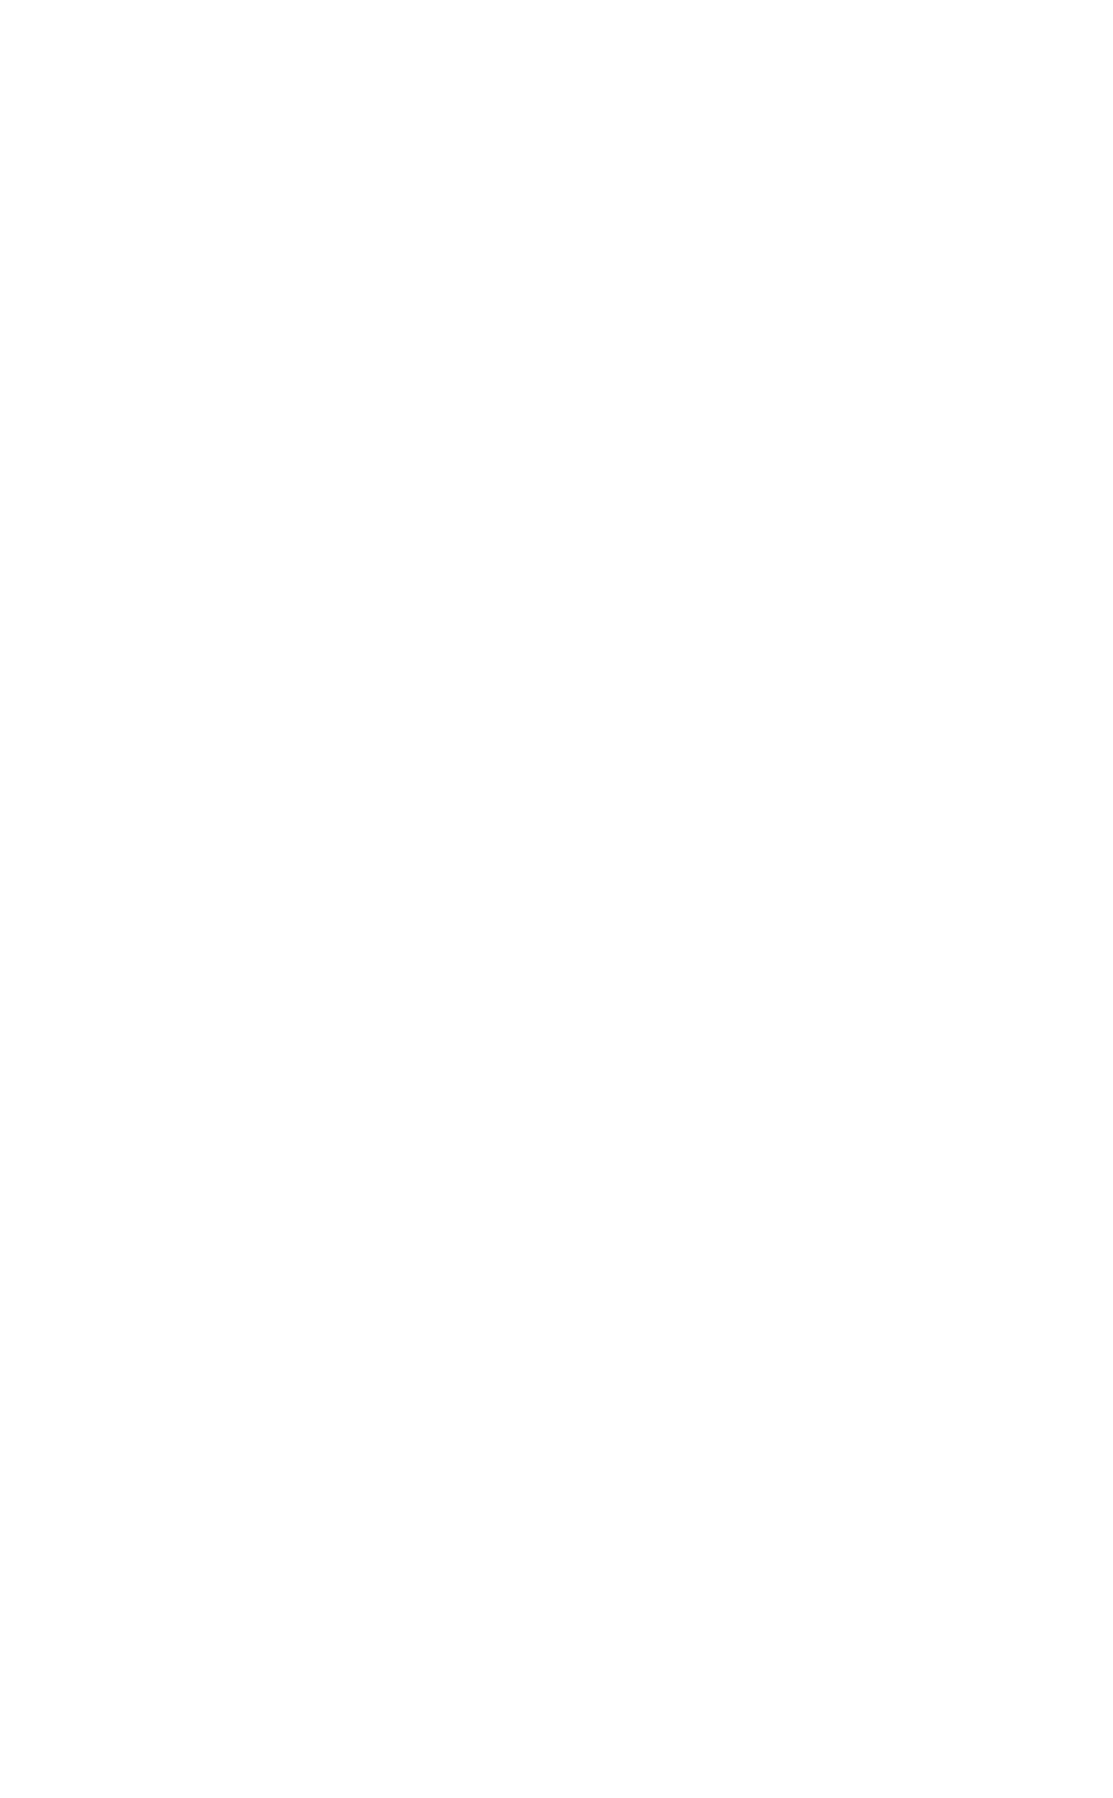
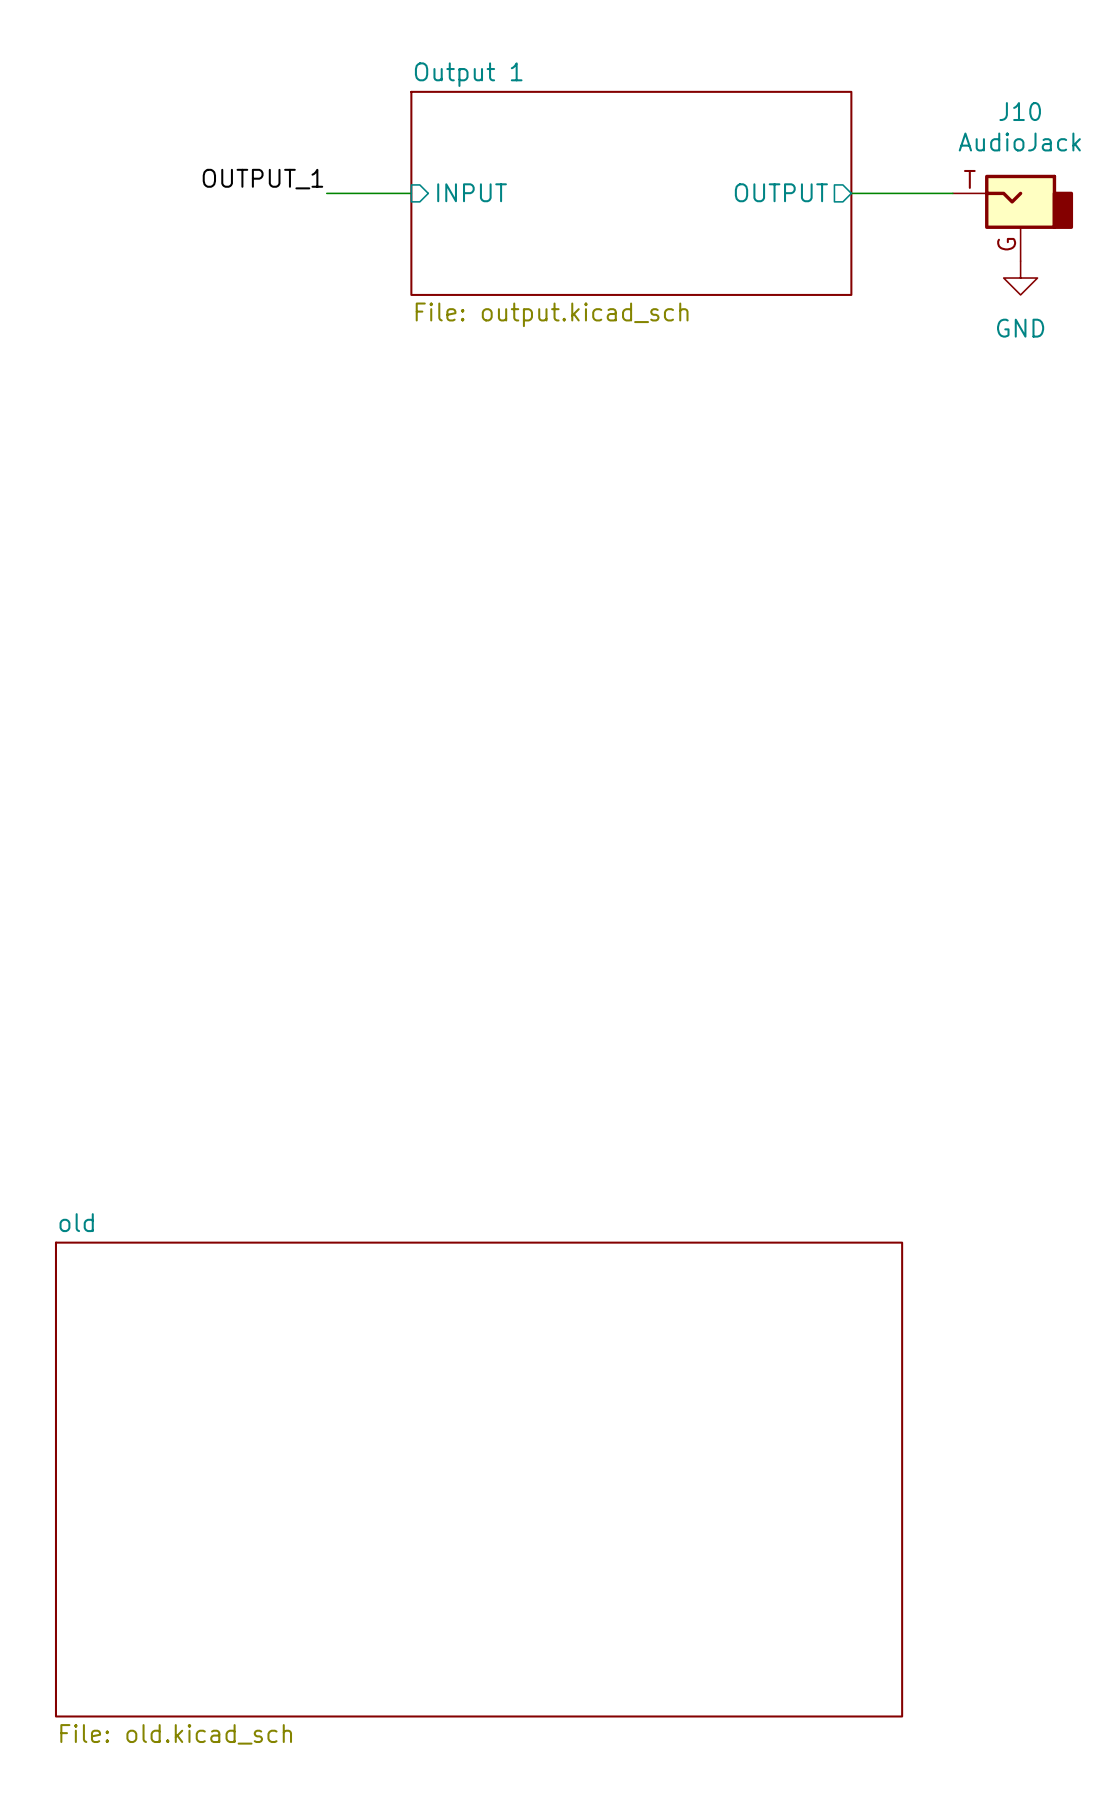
label: none -> OUTPUT_1 (262, 179)
sheet pin: none -> INPUT (472, 192)
sheet pin: none -> OUTPUT (781, 192)
wire: none -> (326, 193) (411, 193)
sheet Output 1: none -> File: output.kicad_sch (631, 193)
wire: none -> (851, 193) (952, 193)
J10: none -> AudioJack (1012, 217)
power symbol: none -> GND (1020, 278)
sheet old: none -> File: old.kicad_sch (479, 1479)

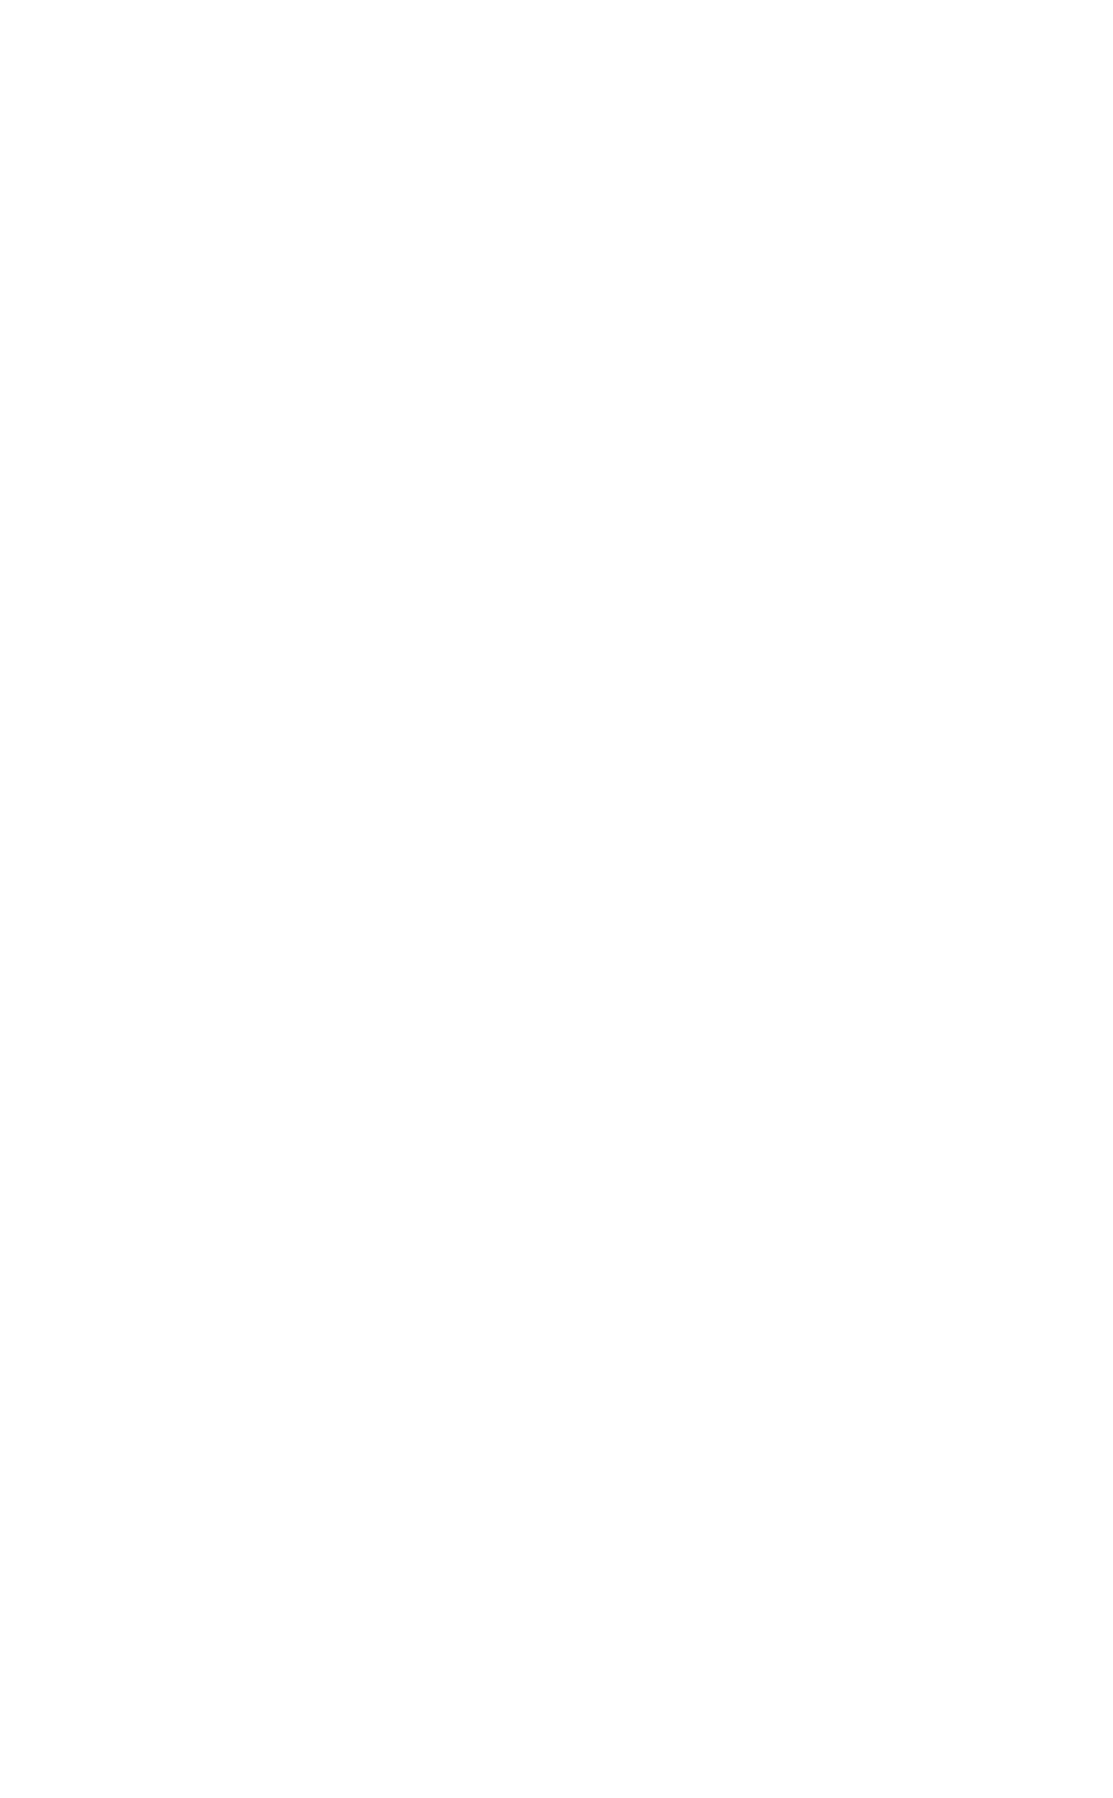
label: OUTPUT_1 (262, 179) -> none
sheet pin: INPUT (472, 192) -> none
sheet pin: OUTPUT (781, 192) -> none
wire: (326, 193) (411, 193) -> none
sheet Output 1: File: output.kicad_sch (631, 193) -> none
wire: (851, 193) (952, 193) -> none
J10: AudioJack (1012, 217) -> none
power symbol: GND (1020, 278) -> none
sheet old: File: old.kicad_sch (479, 1479) -> none

